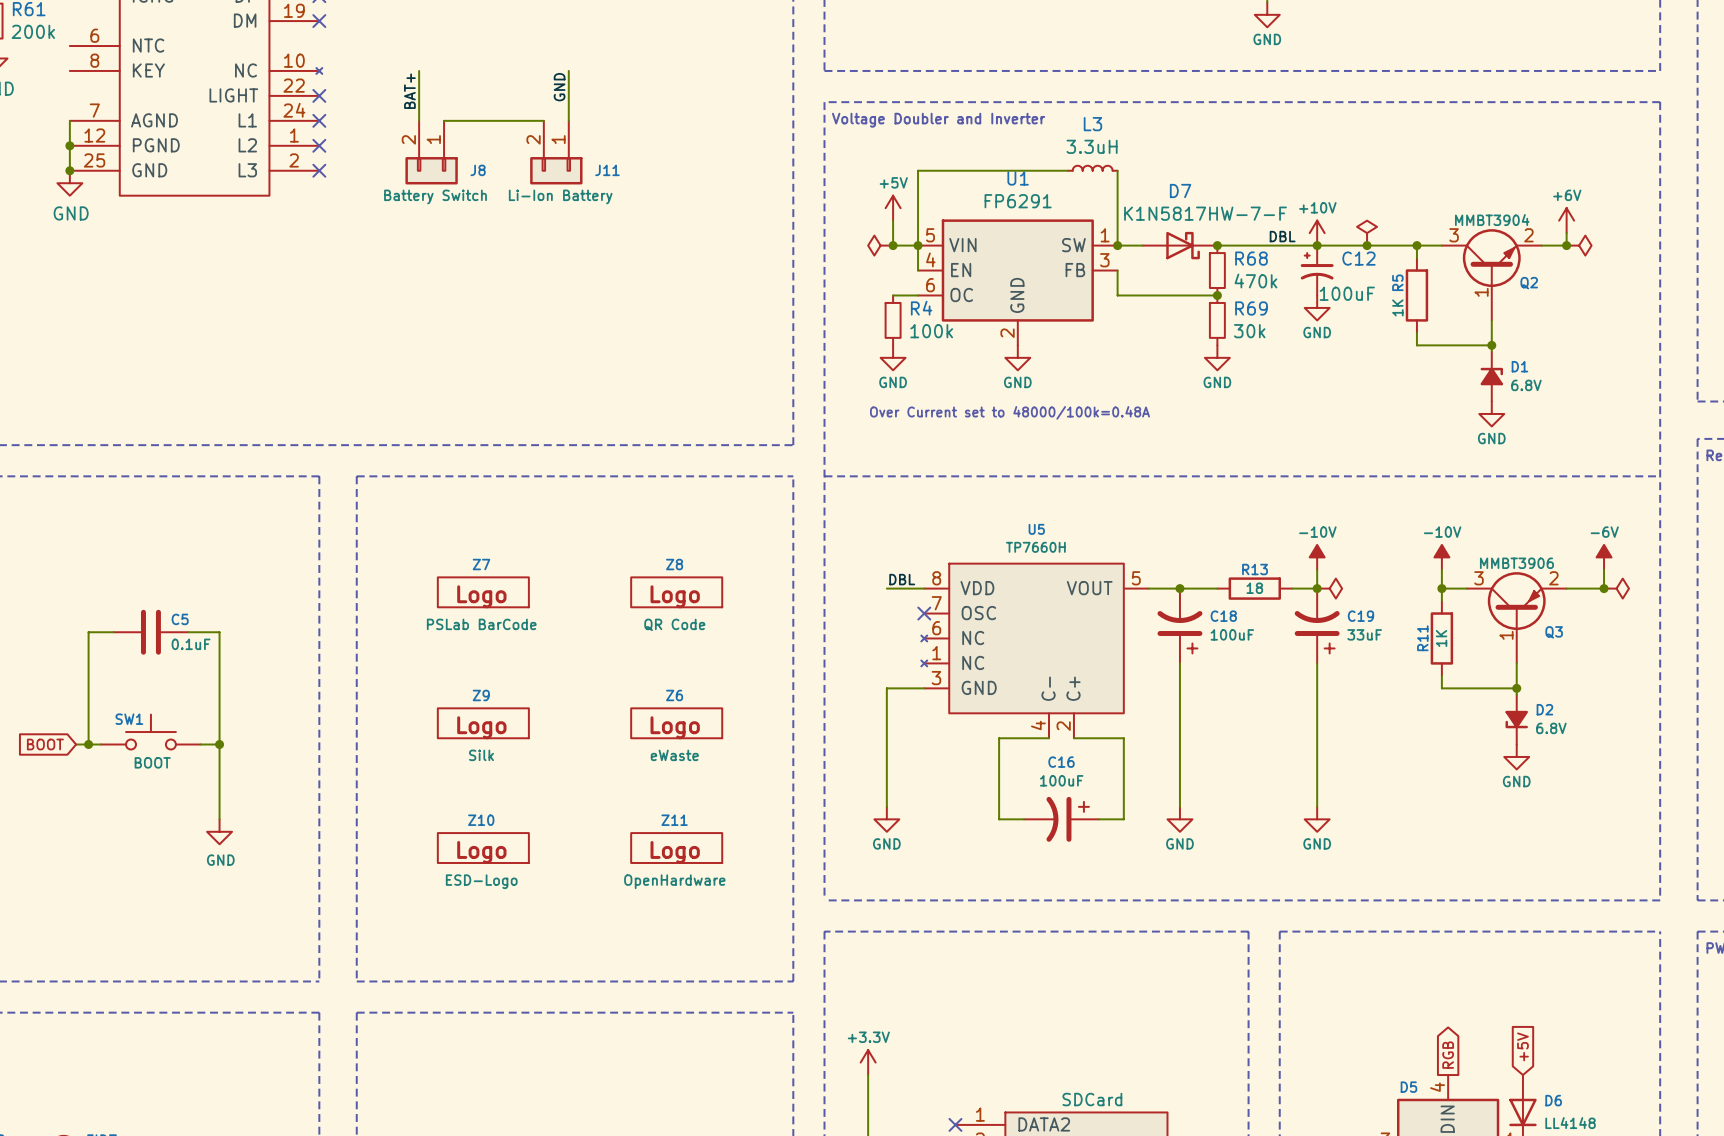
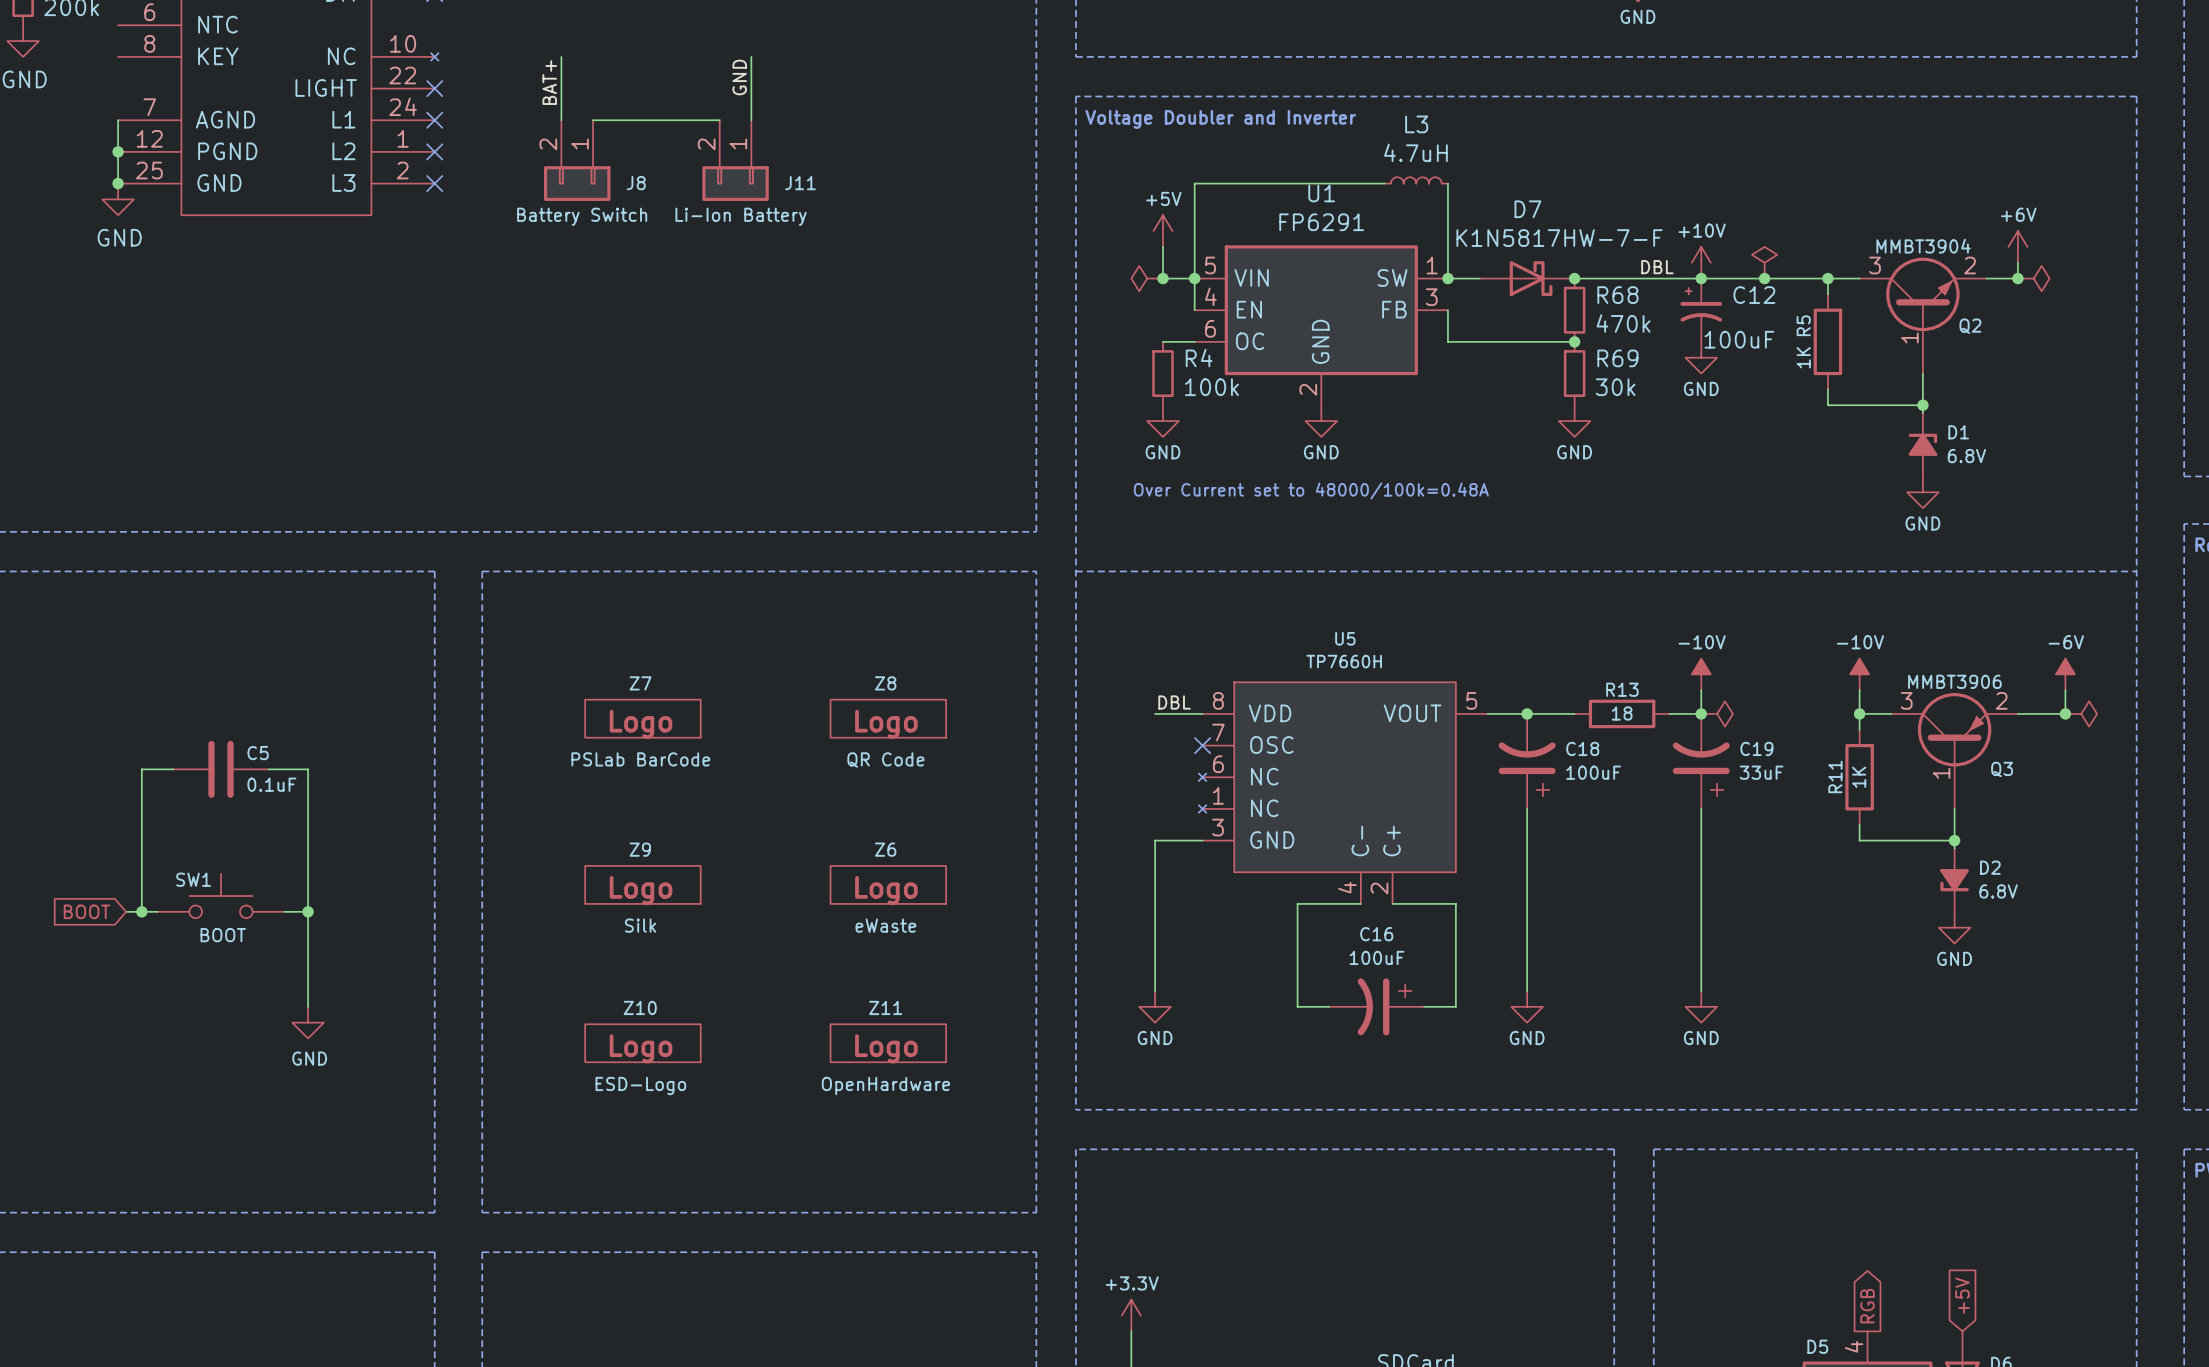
L3 value: 3.3uH (1092, 146) -> 4.7uH (1415, 152)

